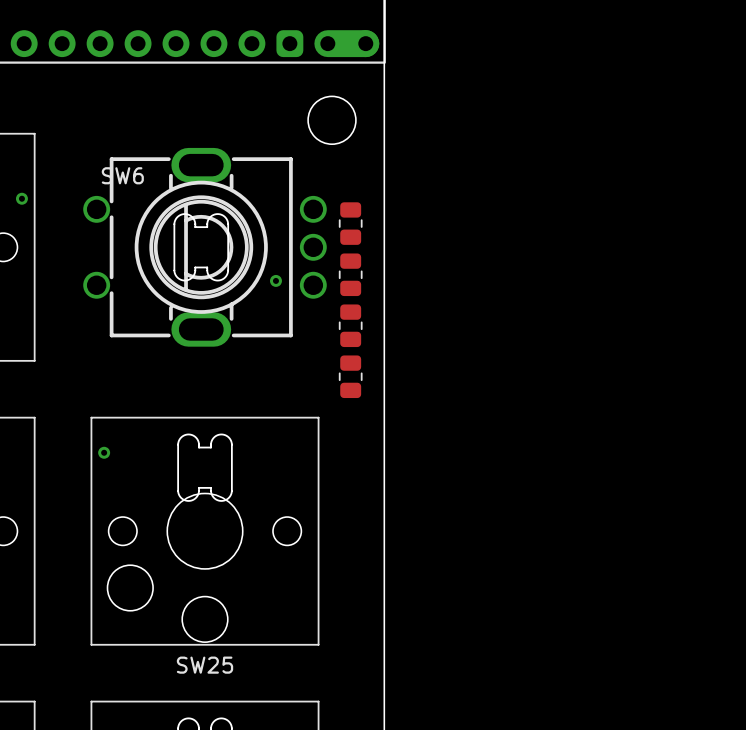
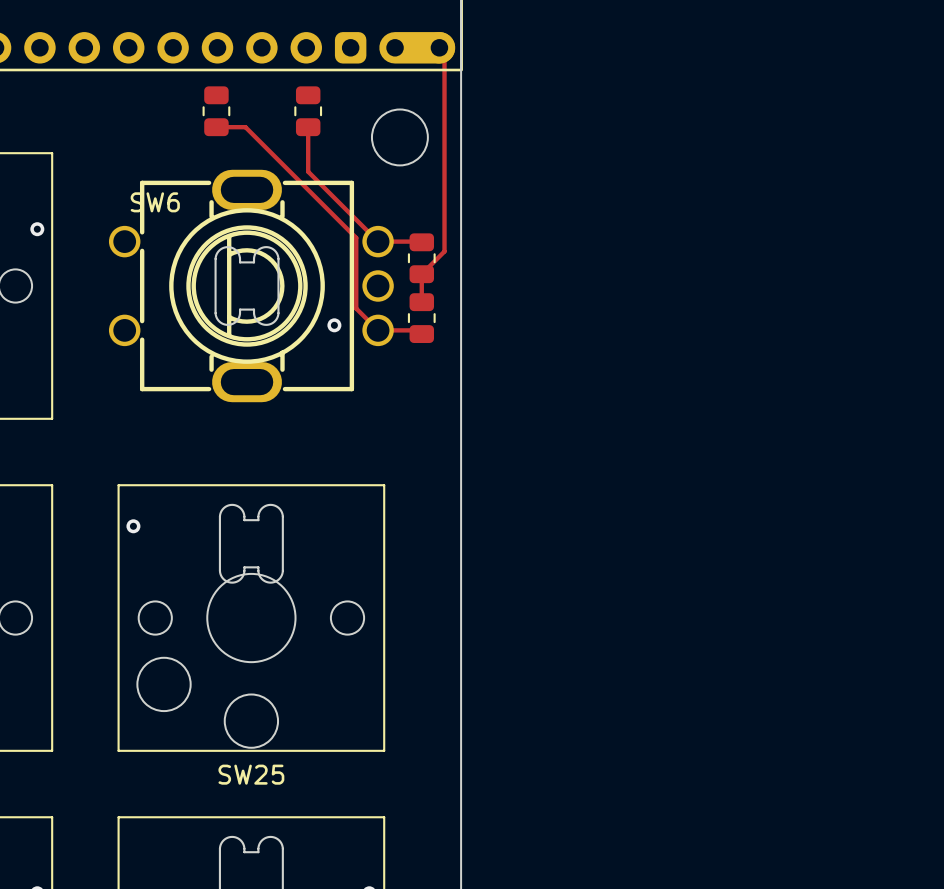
track: none -> (439, 47) (444, 52) (444, 251) (421, 274) (421, 302)
part: none -> (216, 111)
part: none -> (308, 111)
track: none -> (216, 127) (245, 127) (356, 237) (356, 308) (378, 330) (418, 330) (421, 334)
track: none -> (308, 127) (308, 171) (378, 241) (421, 242)
part: (350, 325) -> none
part: (350, 376) -> none

